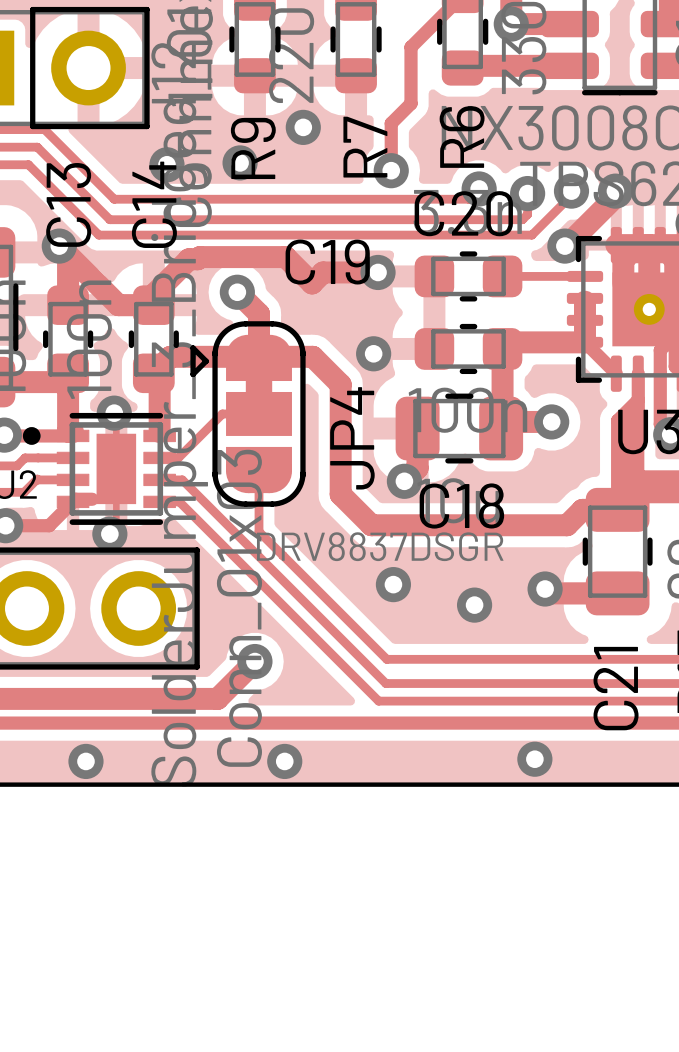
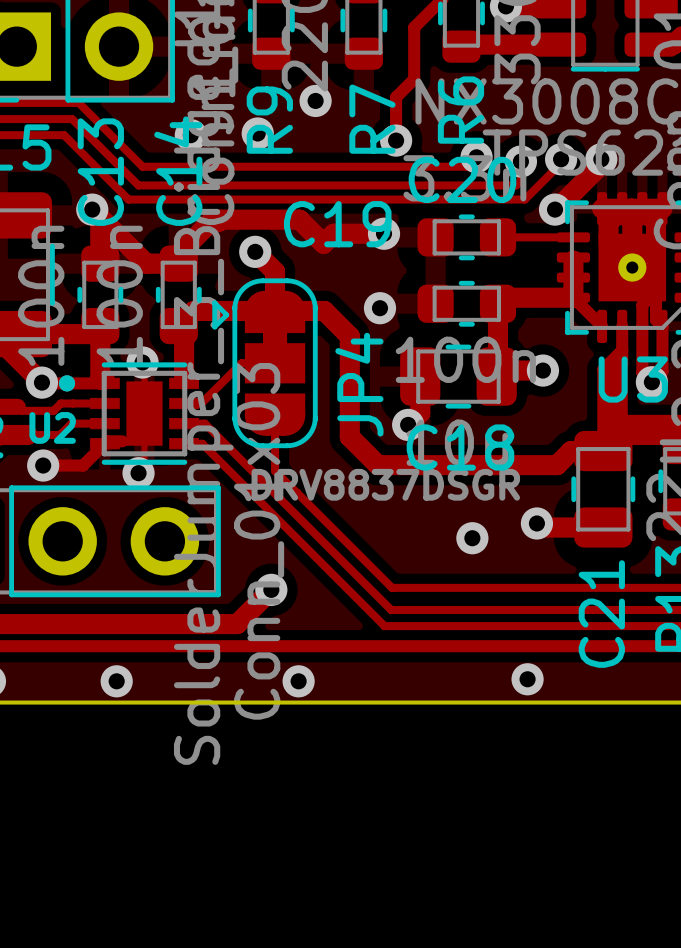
via: (393, 584) -> none

